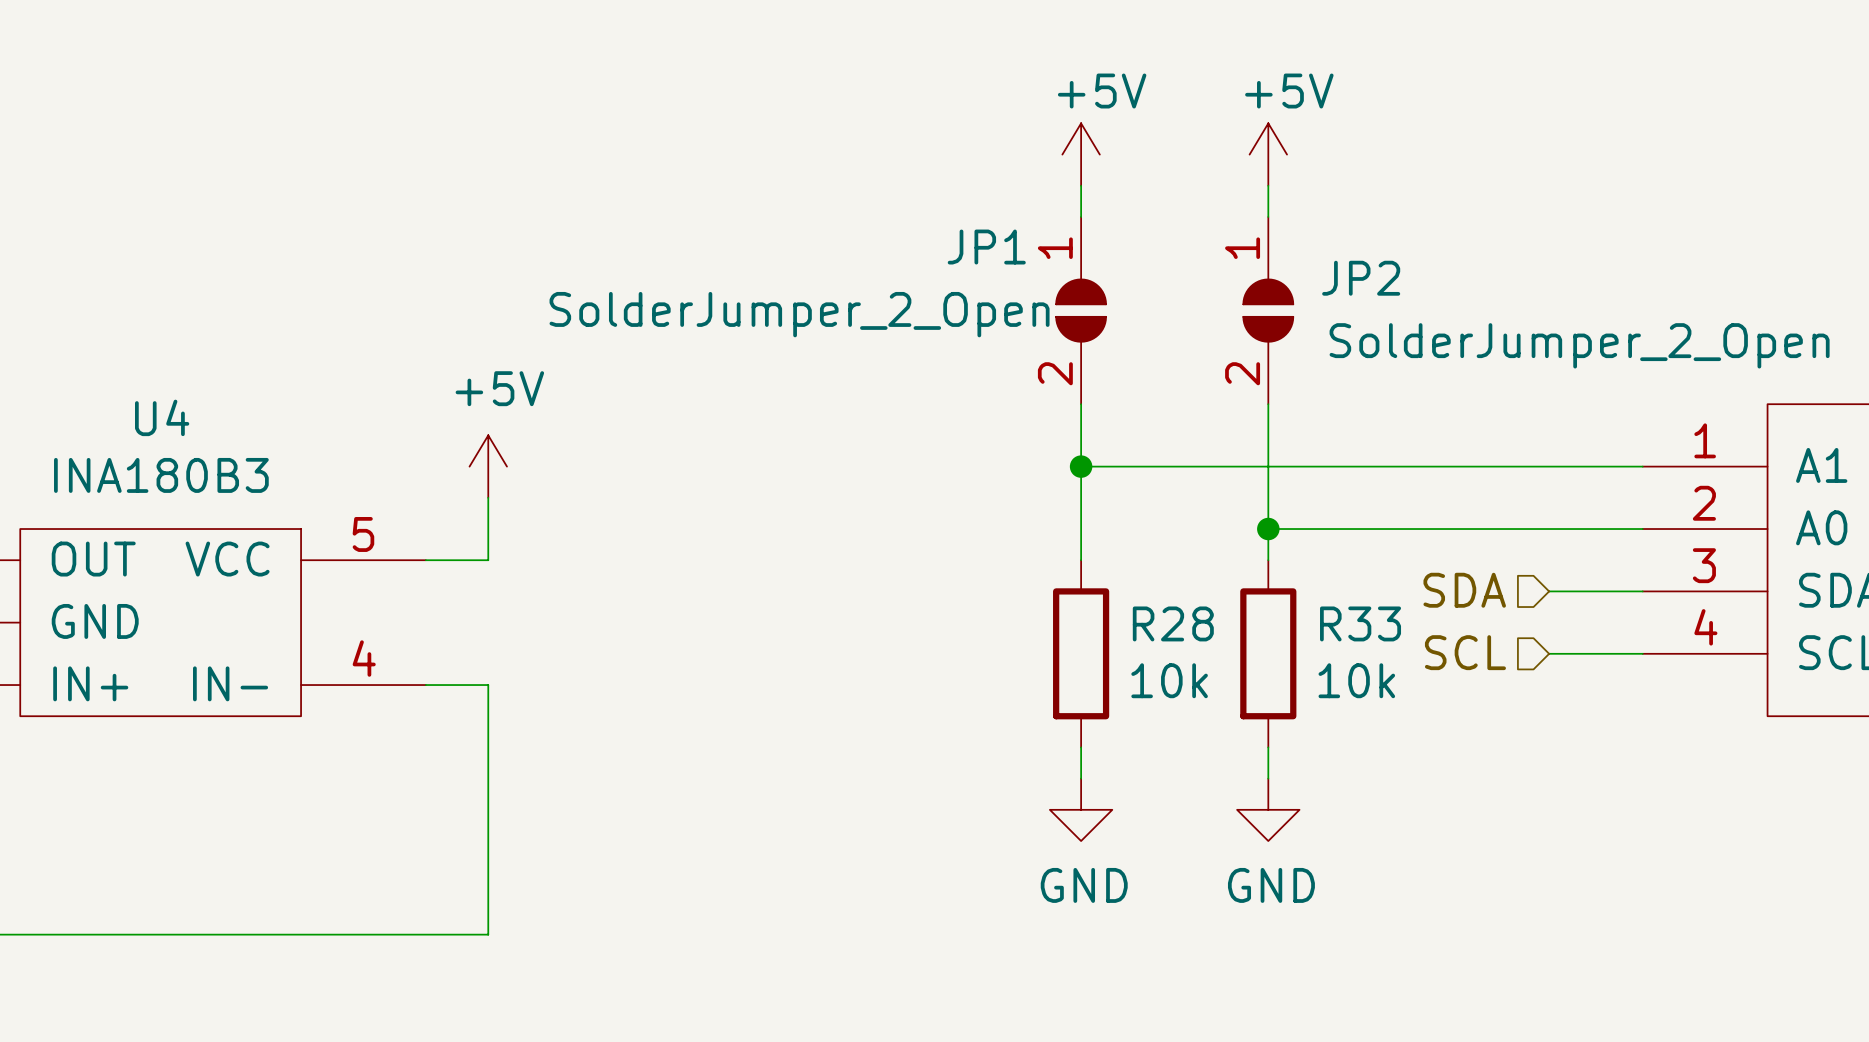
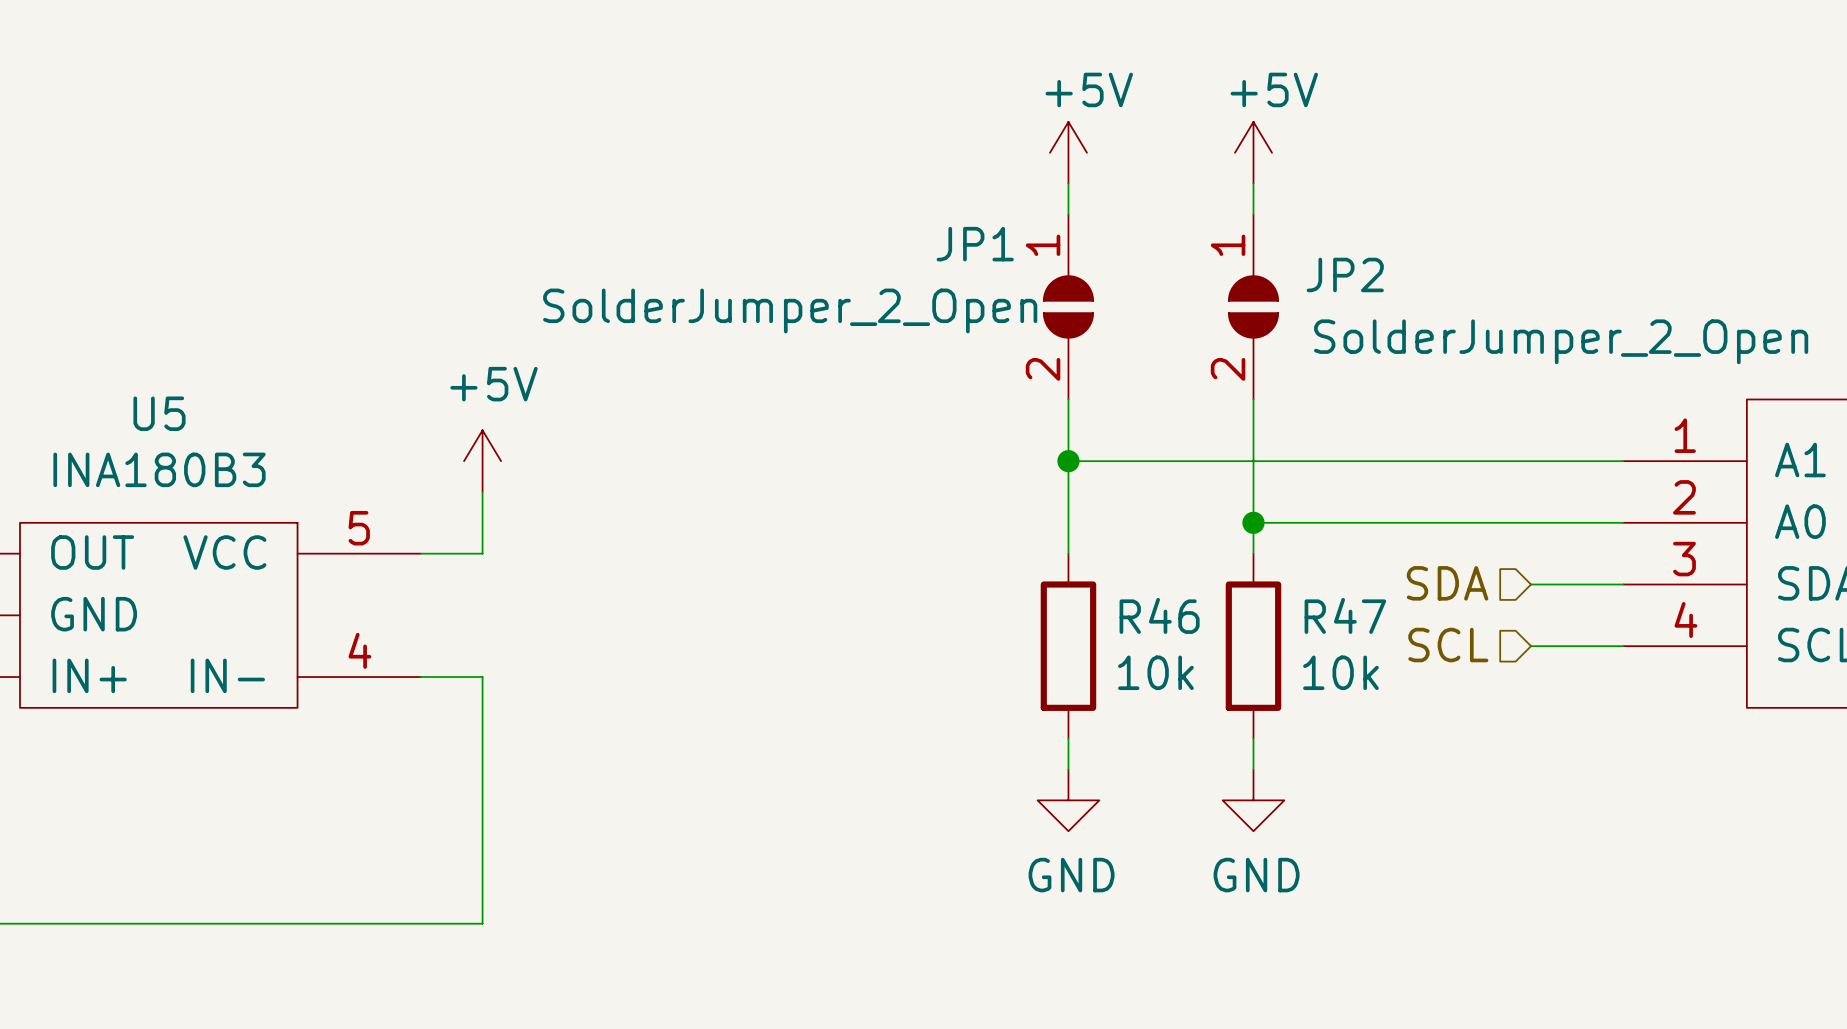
U4 name: U4 (162, 417) -> U5 (159, 413)
R28 name: R28 (1173, 623) -> R46 (1159, 615)
R33 name: R33 (1360, 623) -> R47 (1345, 615)

